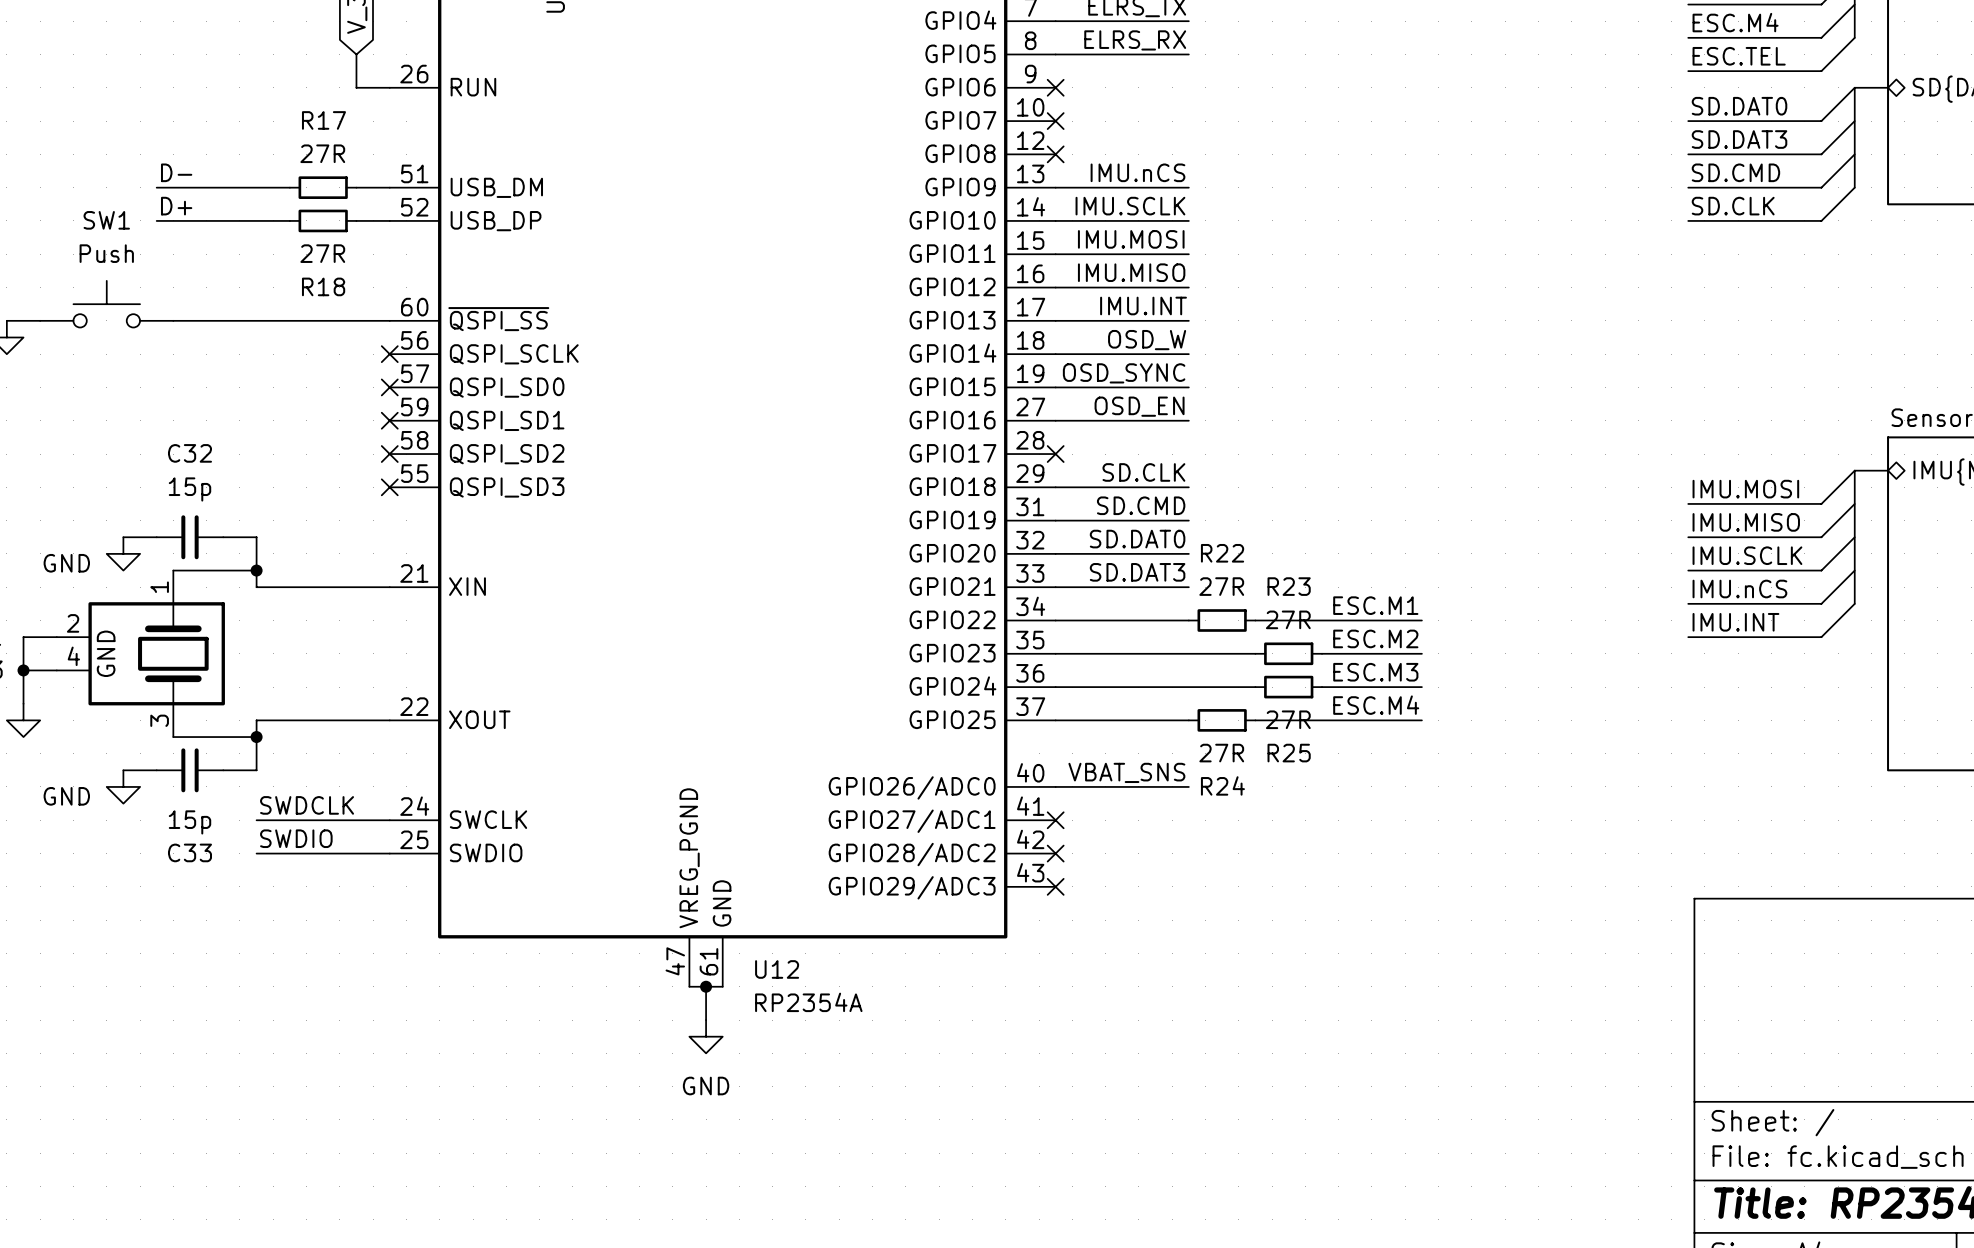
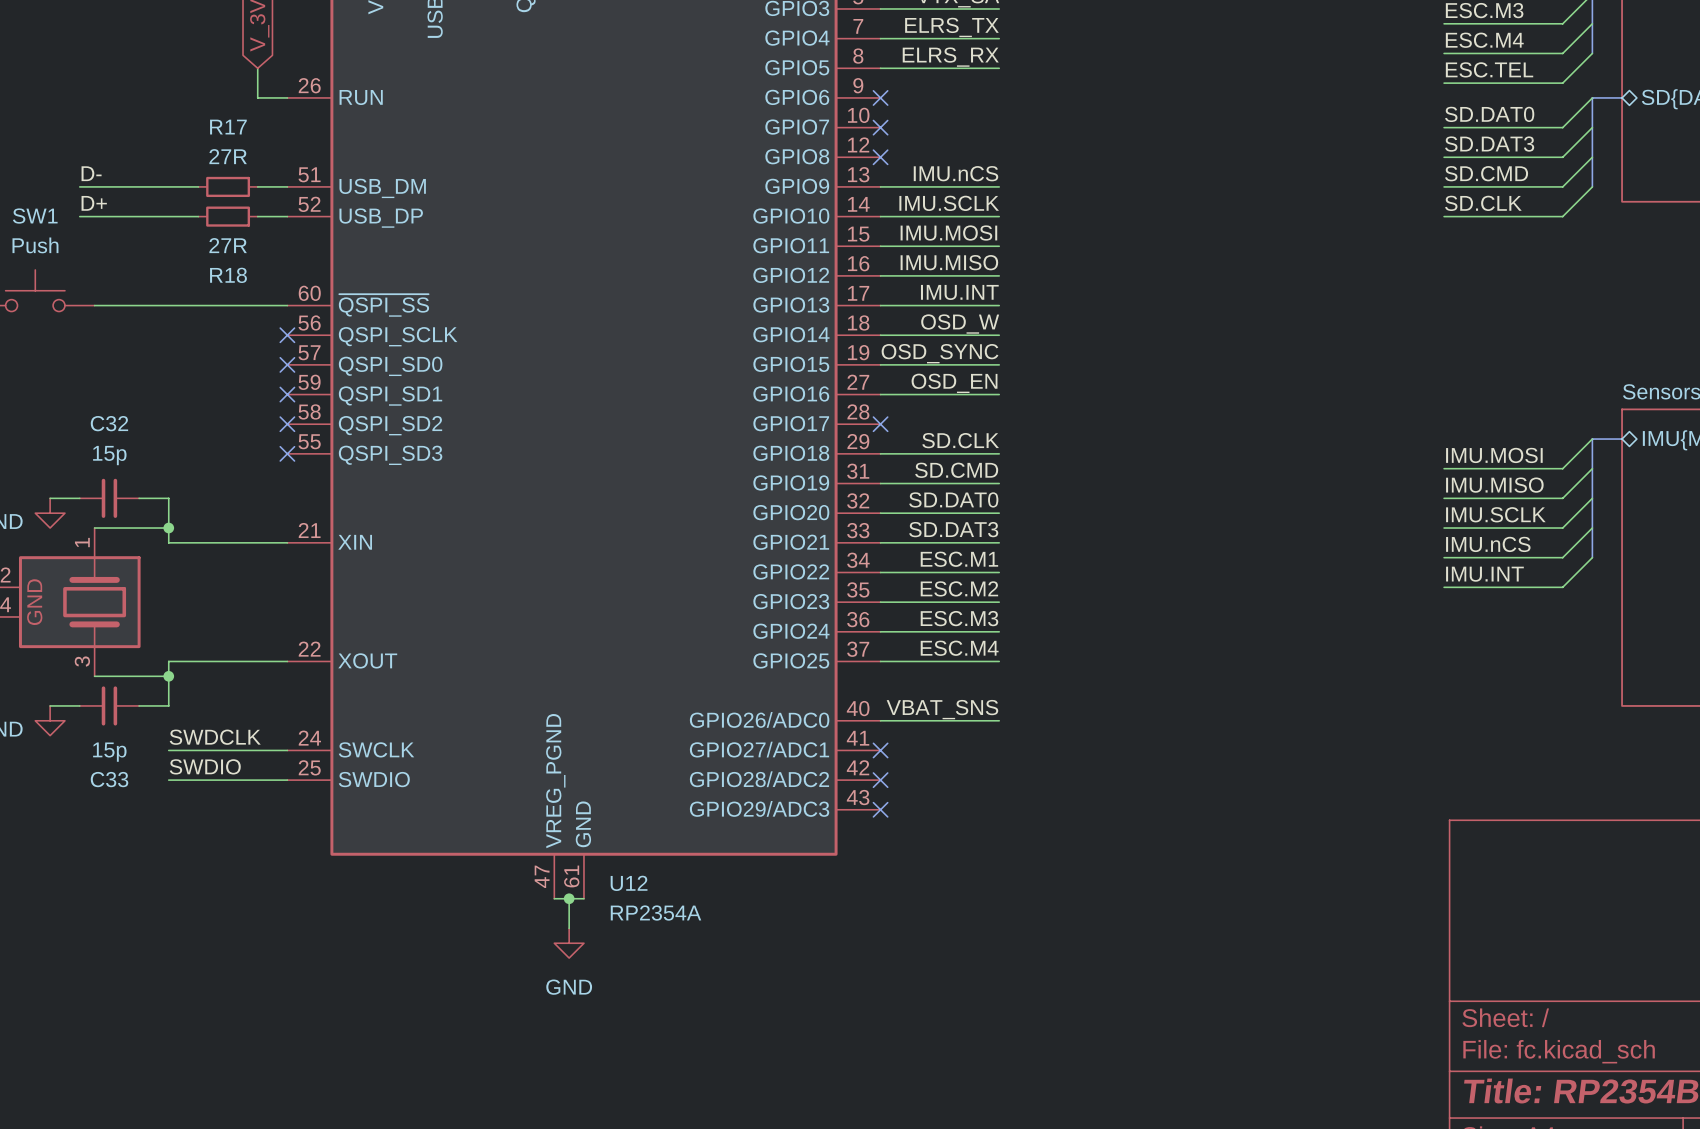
label position: ESC.M1 (1375, 605) -> ESC.M1 (959, 559)
R22: 27R (1222, 620) -> none
wire: (1255, 620) (1421, 620) -> none
label position: ESC.M2 (1375, 638) -> ESC.M2 (959, 588)
wire: (1188, 653) (1255, 653) -> none
R23: 27R (1288, 653) -> none
wire: (1322, 653) (1421, 653) -> none
label position: ESC.M3 (1375, 672) -> ESC.M3 (959, 618)
wire: (1188, 687) (1255, 687) -> none
R25: 27R (1288, 687) -> none
wire: (1322, 687) (1421, 687) -> none
label position: ESC.M4 (1376, 705) -> ESC.M4 (959, 648)
R24: 27R (1222, 720) -> none
wire: (1255, 720) (1421, 720) -> none

